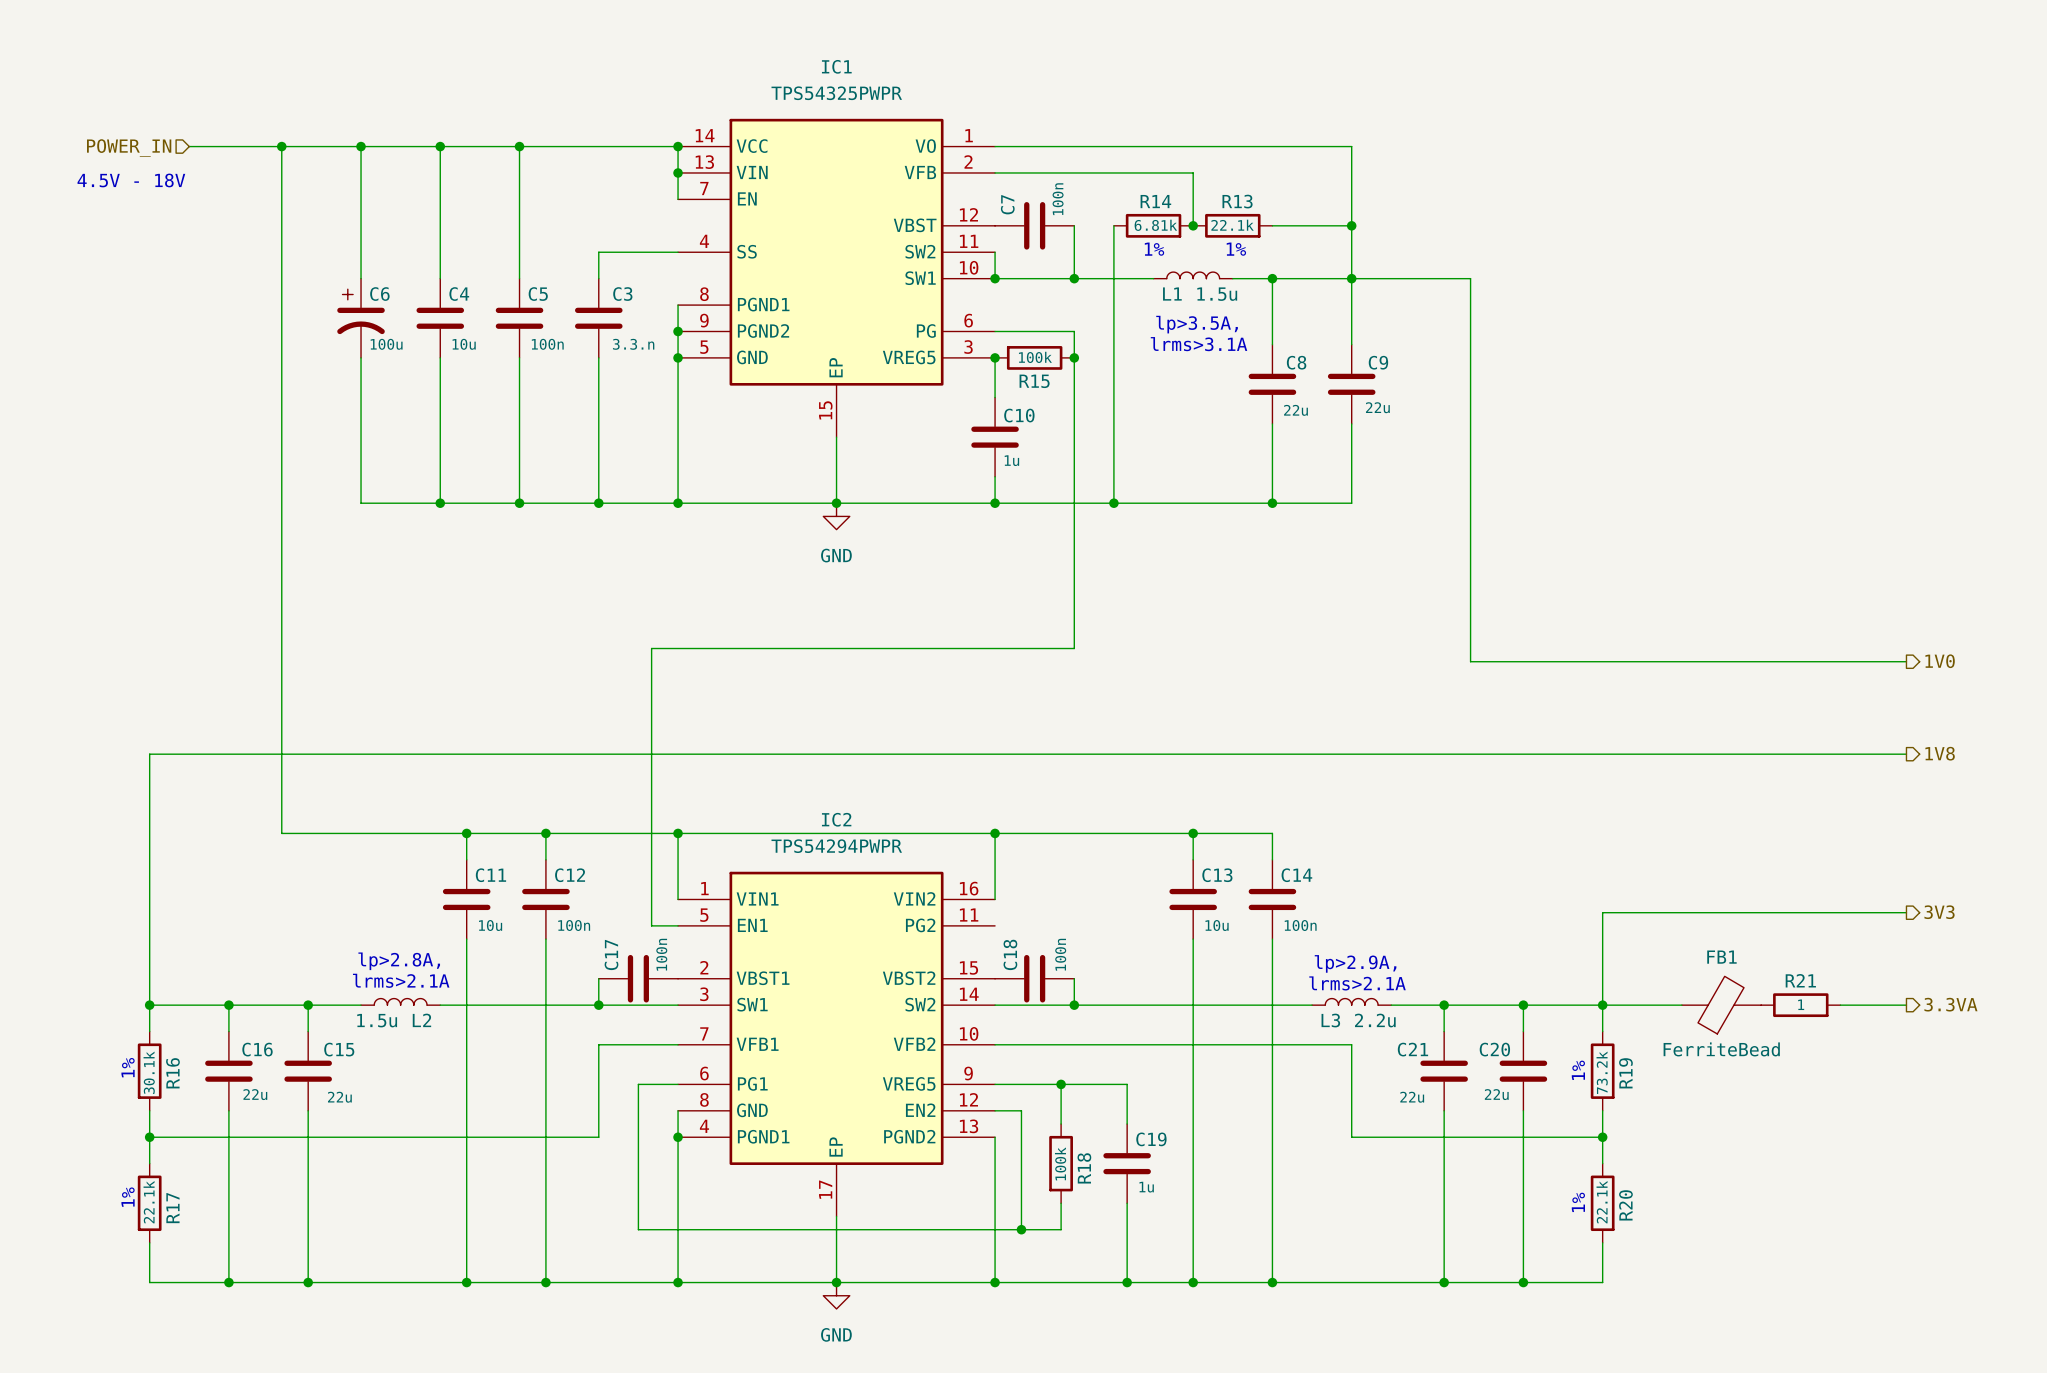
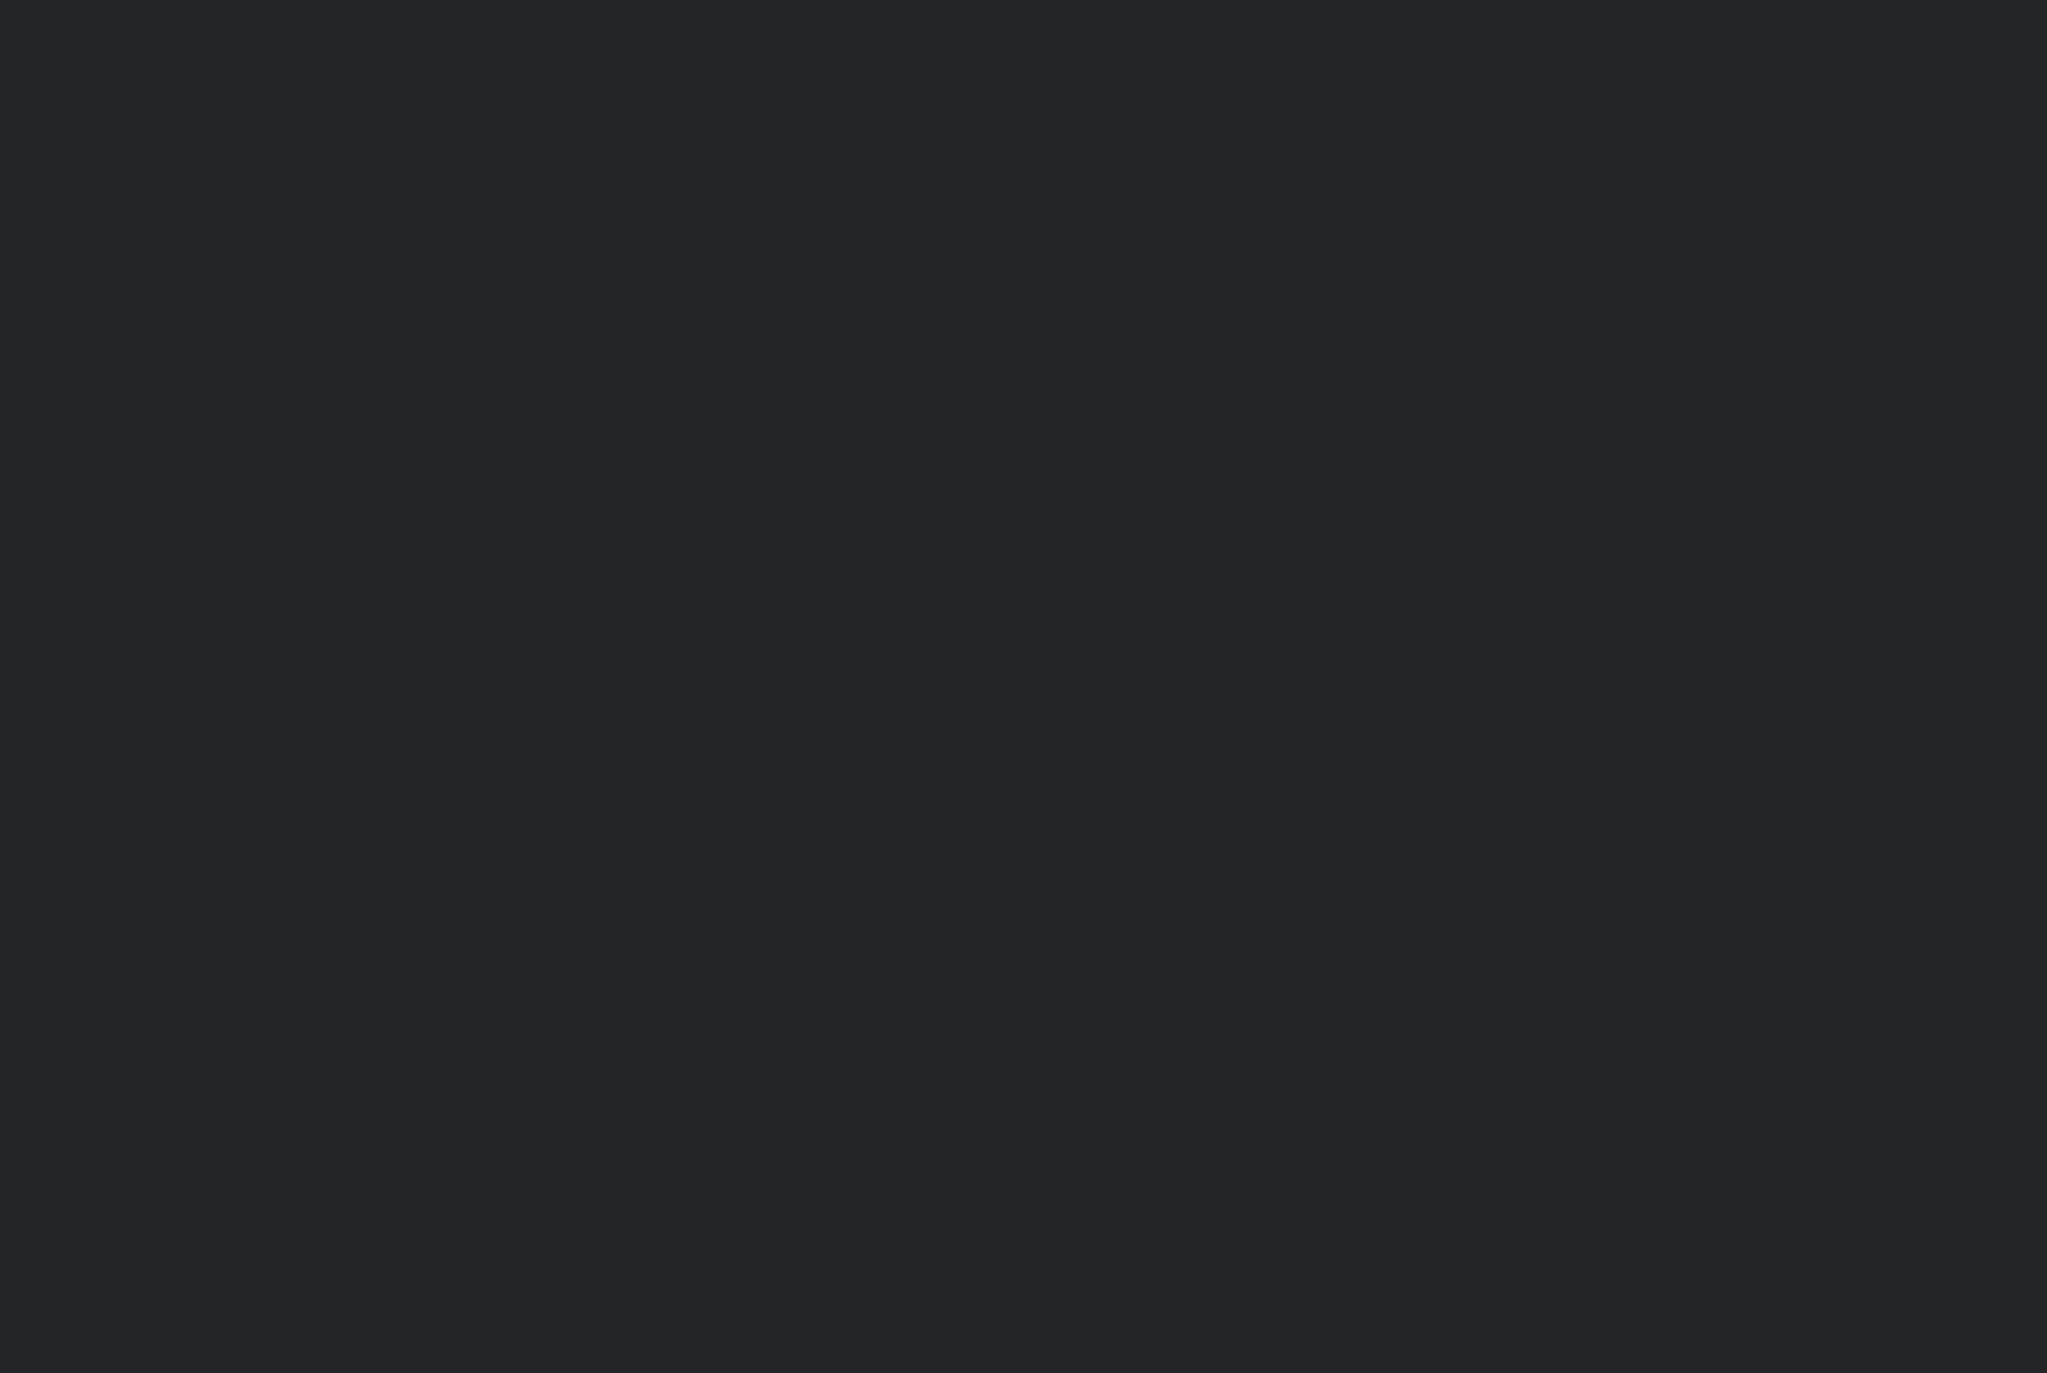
wire: (189, 146) (678, 146) (678, 199) -> none
wire: (281, 146) (281, 833) (1272, 833) (1272, 859) -> none
junction: (281, 146) -> none
wire: (361, 146) (361, 278) -> none
junction: (361, 146) -> none
wire: (440, 146) (440, 278) -> none
junction: (440, 146) -> none
wire: (519, 146) (519, 278) -> none
junction: (519, 146) -> none
junction: (678, 146) -> none
wire: (995, 146) (1351, 146) (1351, 344) -> none
hierarchical label: POWER_IN (129, 148) -> none
junction: (678, 172) -> none
wire: (995, 172) (1193, 172) (1193, 225) -> none
text: 4.5V - 18V (131, 180) -> none
C7: 100n (1034, 225) -> none
wire: (1074, 225) (1074, 278) -> none
wire: (1113, 225) (1113, 503) -> none
R14: 6.81k (1153, 225) -> none
junction: (1193, 225) -> none
R13: 22.1k (1232, 225) -> none
wire: (1272, 225) (1351, 225) -> none
junction: (1351, 225) -> none
text: 1% (1154, 249) -> none
text: 1% (1236, 249) -> none
wire: (678, 252) (598, 252) (598, 278) -> none
wire: (995, 252) (995, 278) (1153, 278) -> none
L1: 1.5u (1193, 275) -> none
IC1: TPS54325PWPR (836, 278) -> none
junction: (995, 278) -> none
junction: (1074, 278) -> none
wire: (1232, 278) (1470, 278) (1470, 661) (1906, 661) -> none
wire: (1272, 278) (1272, 344) -> none
junction: (1272, 278) -> none
junction: (1351, 278) -> none
wire: (678, 305) (678, 503) -> none
C6: 100u (361, 318) -> none
C4: 10u (440, 318) -> none
C5: 100n (519, 318) -> none
C3: 3.3.n (598, 318) -> none
text: lp>3.5A, (1197, 324) -> none
junction: (678, 331) -> none
wire: (995, 331) (1074, 331) (1074, 648) (651, 648) (651, 925) (678, 925) -> none
text: lrms>3.1A (1199, 344) -> none
wire: (361, 357) (361, 503) (1351, 503) (1351, 423) -> none
wire: (440, 357) (440, 503) -> none
wire: (519, 357) (519, 503) -> none
wire: (598, 357) (598, 503) -> none
junction: (678, 357) -> none
wire: (995, 357) (995, 397) -> none
junction: (995, 357) -> none
R15: 100k (1034, 357) -> none
junction: (1074, 357) -> none
C8: 22u (1272, 384) -> none
C9: 22u (1351, 384) -> none
wire: (1272, 423) (1272, 503) -> none
wire: (836, 437) (836, 503) -> none
C10: 1u (995, 437) -> none
wire: (995, 476) (995, 503) -> none
junction: (440, 503) -> none
junction: (519, 503) -> none
junction: (598, 503) -> none
junction: (678, 503) -> none
junction: (836, 503) -> none
junction: (995, 503) -> none
junction: (1113, 503) -> none
junction: (1272, 503) -> none
power symbol: GND (836, 516) -> none
hierarchical label: 1V0 (1940, 661) -> none
hierarchical label: 1V8 (1940, 753) -> none
wire: (1906, 754) (149, 754) (149, 1031) -> none
wire: (466, 833) (466, 859) -> none
junction: (466, 833) -> none
wire: (545, 833) (545, 859) -> none
junction: (545, 833) -> none
wire: (678, 833) (678, 899) -> none
junction: (678, 833) -> none
wire: (995, 833) (995, 899) -> none
junction: (995, 833) -> none
wire: (1193, 833) (1193, 859) -> none
junction: (1193, 833) -> none
C11: 10u (466, 899) -> none
C12: 100n (545, 899) -> none
C13: 10u (1193, 899) -> none
C14: 100n (1272, 899) -> none
wire: (1906, 912) (1602, 912) (1602, 1031) -> none
hierarchical label: 3V3 (1939, 912) -> none
wire: (466, 939) (466, 1282) -> none
wire: (545, 939) (545, 1282) -> none
wire: (1193, 939) (1193, 1282) -> none
wire: (1272, 939) (1272, 1282) -> none
text: lp>2.8A, (399, 961) -> none
text: lp>2.9A, (1355, 963) -> none
wire: (598, 978) (598, 1005) -> none
C17: 100n (638, 978) -> none
C18: 100n (1034, 978) -> none
wire: (1074, 978) (1074, 1005) -> none
text: lrms>2.1A (401, 980) -> none
text: lrms>2.1A (1357, 983) -> none
L2: 1.5u (400, 1001) -> none
L3: 2.2u (1351, 1001) -> none
hierarchical label: 3.3VA (1950, 1004) -> none
wire: (149, 1005) (361, 1005) -> none
junction: (149, 1005) -> none
wire: (228, 1005) (228, 1031) -> none
junction: (228, 1005) -> none
wire: (308, 1005) (308, 1031) -> none
junction: (308, 1005) -> none
wire: (440, 1005) (678, 1005) -> none
junction: (598, 1005) -> none
wire: (995, 1005) (1312, 1005) -> none
junction: (1074, 1005) -> none
wire: (1391, 1005) (1681, 1005) -> none
wire: (1444, 1005) (1444, 1031) -> none
junction: (1444, 1005) -> none
wire: (1523, 1005) (1523, 1031) -> none
junction: (1523, 1005) -> none
junction: (1602, 1005) -> none
FB1: FerriteBead (1721, 1005) -> none
R21: 1 (1800, 1005) -> none
wire: (1840, 1005) (1906, 1005) -> none
wire: (678, 1044) (598, 1044) (598, 1137) (149, 1137) -> none
IC2: TPS54294PWPR (836, 1044) -> none
wire: (995, 1044) (1351, 1044) (1351, 1137) (1602, 1137) -> none
text: 1% (128, 1067) -> none
text: 1% (1578, 1070) -> none
R16: 30.1k (149, 1071) -> none
C16: 22u (228, 1071) -> none
C15: 22u (308, 1071) -> none
C21: 22u (1444, 1071) -> none
C20: 22u (1523, 1071) -> none
R19: 73.2k (1602, 1071) -> none
wire: (678, 1084) (638, 1084) (638, 1229) (1061, 1229) (1061, 1203) -> none
wire: (995, 1084) (1127, 1084) (1127, 1124) -> none
wire: (1061, 1084) (1061, 1124) -> none
junction: (1061, 1084) -> none
wire: (149, 1110) (149, 1163) -> none
wire: (228, 1110) (228, 1282) -> none
wire: (308, 1110) (308, 1282) -> none
wire: (678, 1110) (678, 1282) -> none
wire: (995, 1110) (1021, 1110) (1021, 1229) -> none
wire: (1444, 1110) (1444, 1282) -> none
wire: (1523, 1110) (1523, 1282) -> none
wire: (1602, 1110) (1602, 1163) -> none
junction: (149, 1137) -> none
junction: (678, 1137) -> none
wire: (995, 1137) (995, 1282) -> none
junction: (1602, 1137) -> none
R18: 100k (1061, 1163) -> none
C19: 1u (1127, 1163) -> none
text: 1% (128, 1197) -> none
text: 1% (1578, 1202) -> none
R17: 22.1k (149, 1203) -> none
wire: (1127, 1203) (1127, 1282) -> none
R20: 22.1k (1602, 1203) -> none
wire: (836, 1216) (836, 1282) -> none
junction: (1021, 1229) -> none
wire: (149, 1242) (149, 1282) (1602, 1282) (1602, 1242) -> none
junction: (228, 1282) -> none
junction: (308, 1282) -> none
junction: (466, 1282) -> none
junction: (545, 1282) -> none
junction: (678, 1282) -> none
junction: (836, 1282) -> none
junction: (995, 1282) -> none
junction: (1127, 1282) -> none
junction: (1193, 1282) -> none
junction: (1272, 1282) -> none
junction: (1444, 1282) -> none
junction: (1523, 1282) -> none
power symbol: GND (836, 1295) -> none

